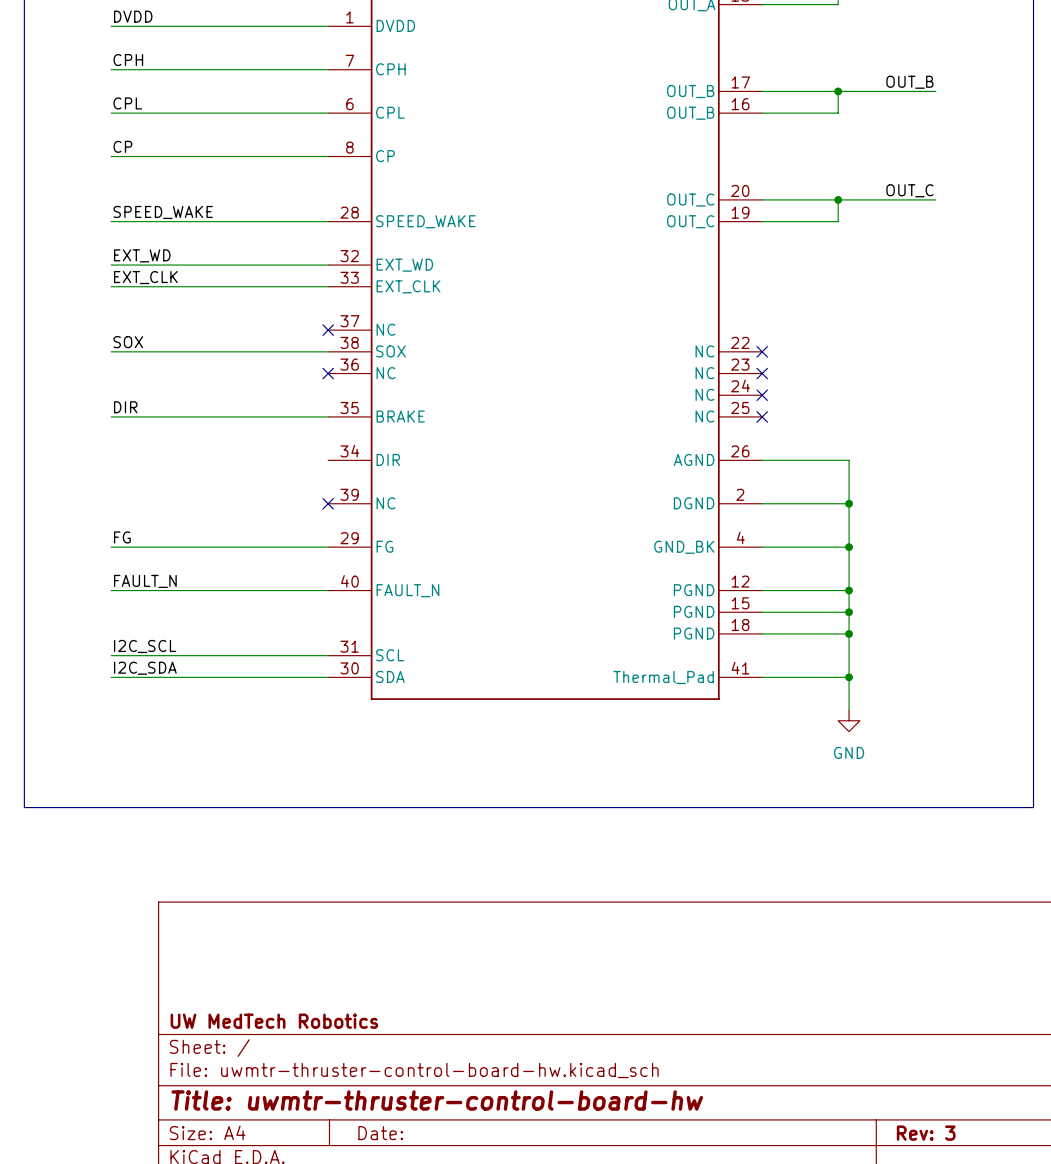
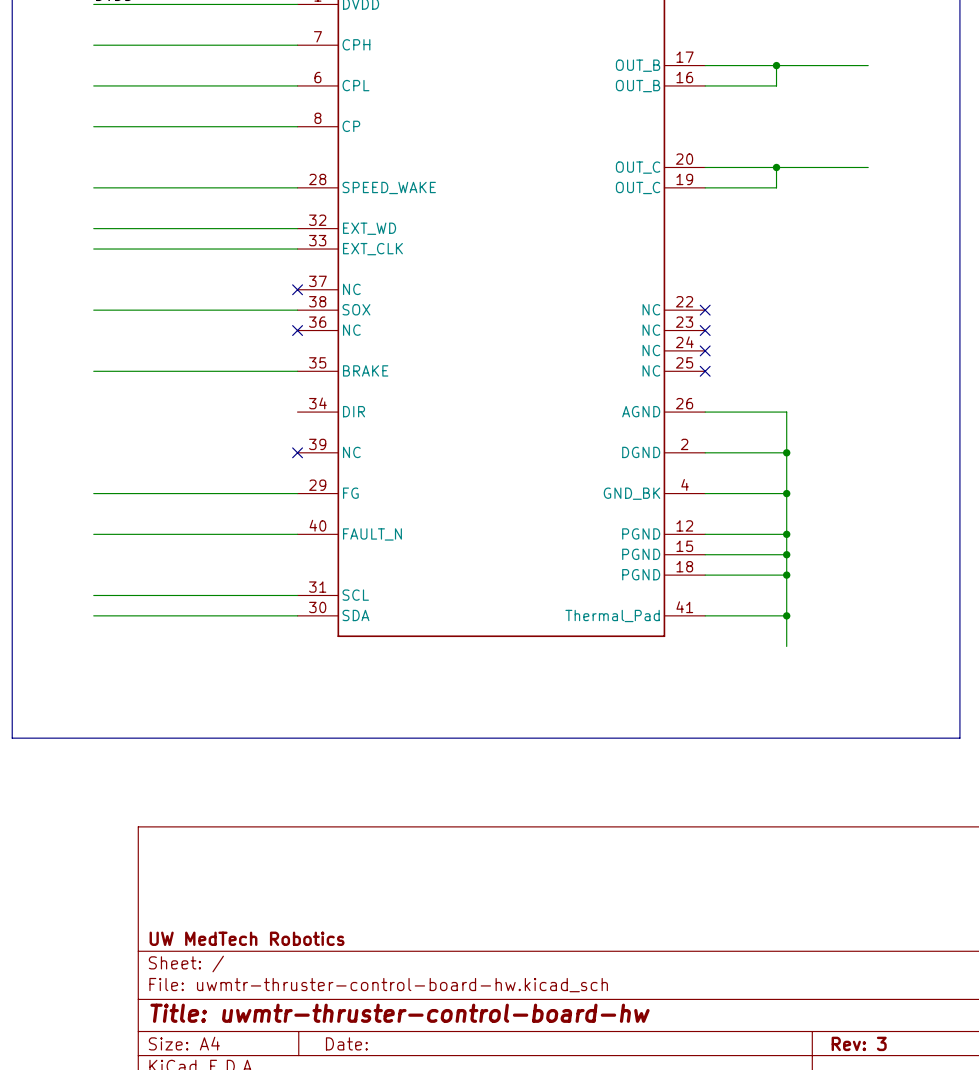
label: CPH (128, 60) -> none
label: OUT_B (909, 82) -> none
label: CPL (127, 103) -> none
label: CP (122, 146) -> none
label: OUT_C (909, 190) -> none
label: SPEED_WAKE (163, 212) -> none
label: EXT_WD (142, 255) -> none
label: EXT_CLK (145, 277) -> none
label: SOX (128, 342) -> none
label: DIR (125, 407) -> none
label: FG (122, 537) -> none
label: FAULT_N (145, 581) -> none
label: I2C_SCL (145, 646) -> none
label: I2C_SDA (145, 668) -> none
power symbol: GND (849, 720) -> none

